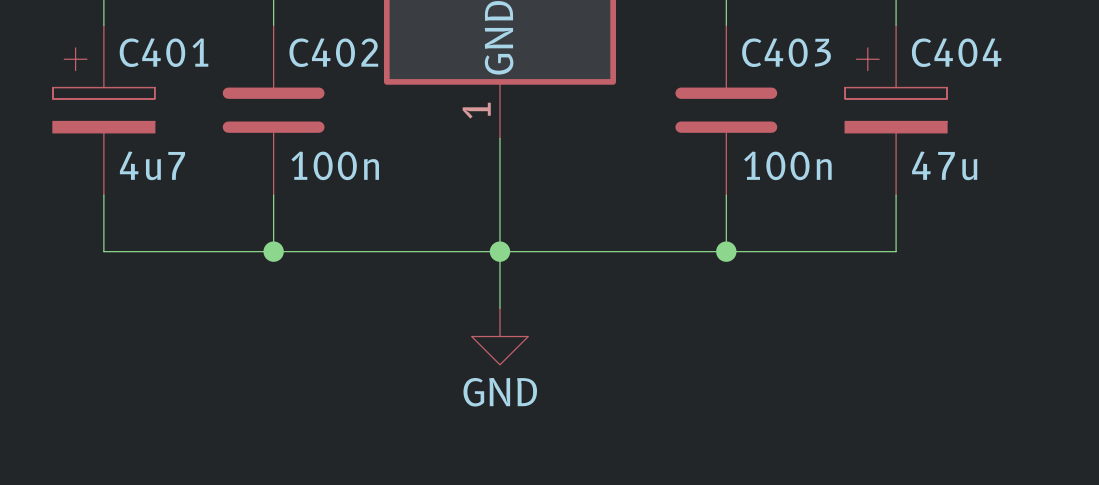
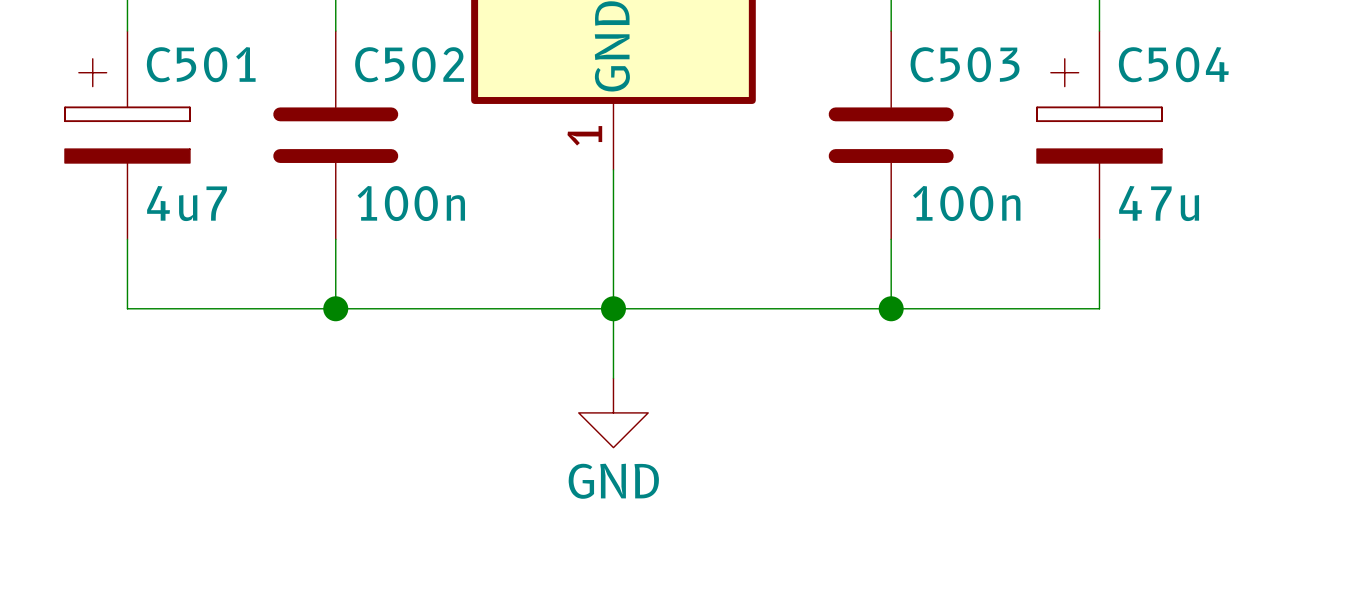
C401 name: C401 (163, 52) -> C501 (201, 64)
C402 name: C402 (333, 52) -> C502 (409, 64)
C403 name: C403 (786, 52) -> C503 (965, 64)
C404 name: C404 (956, 52) -> C504 (1173, 64)

